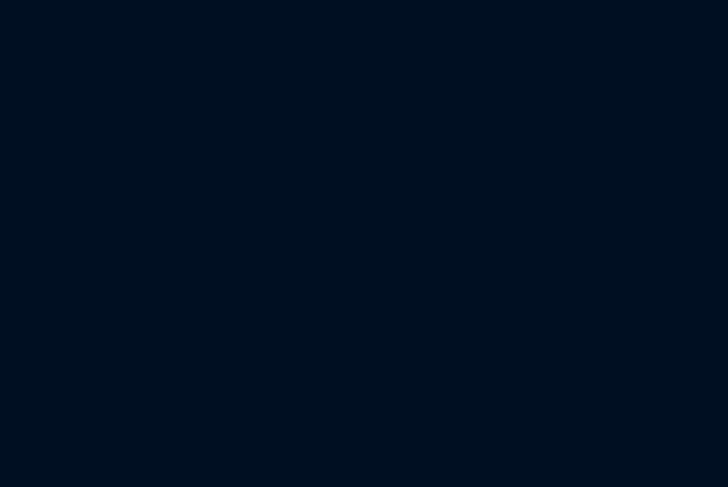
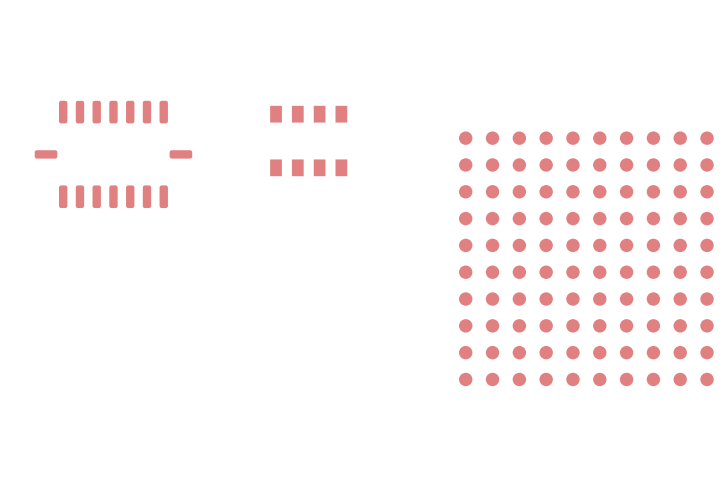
part: none -> (308, 141)
part: none -> (113, 154)
part: none -> (586, 258)

